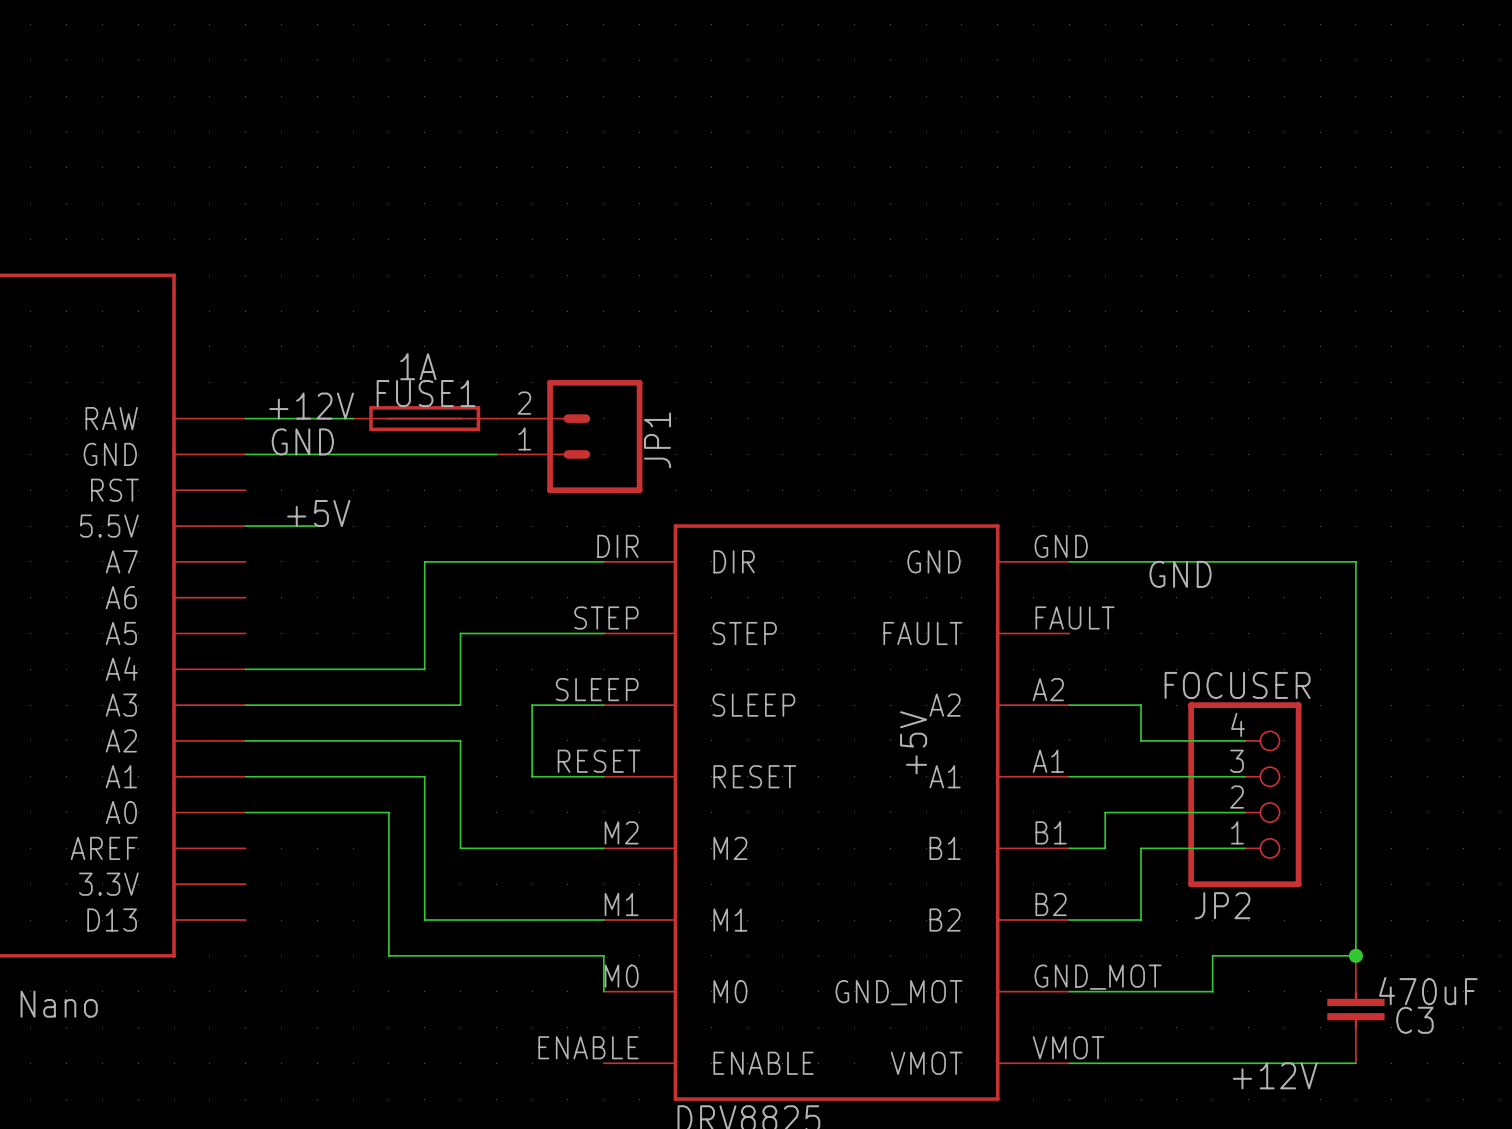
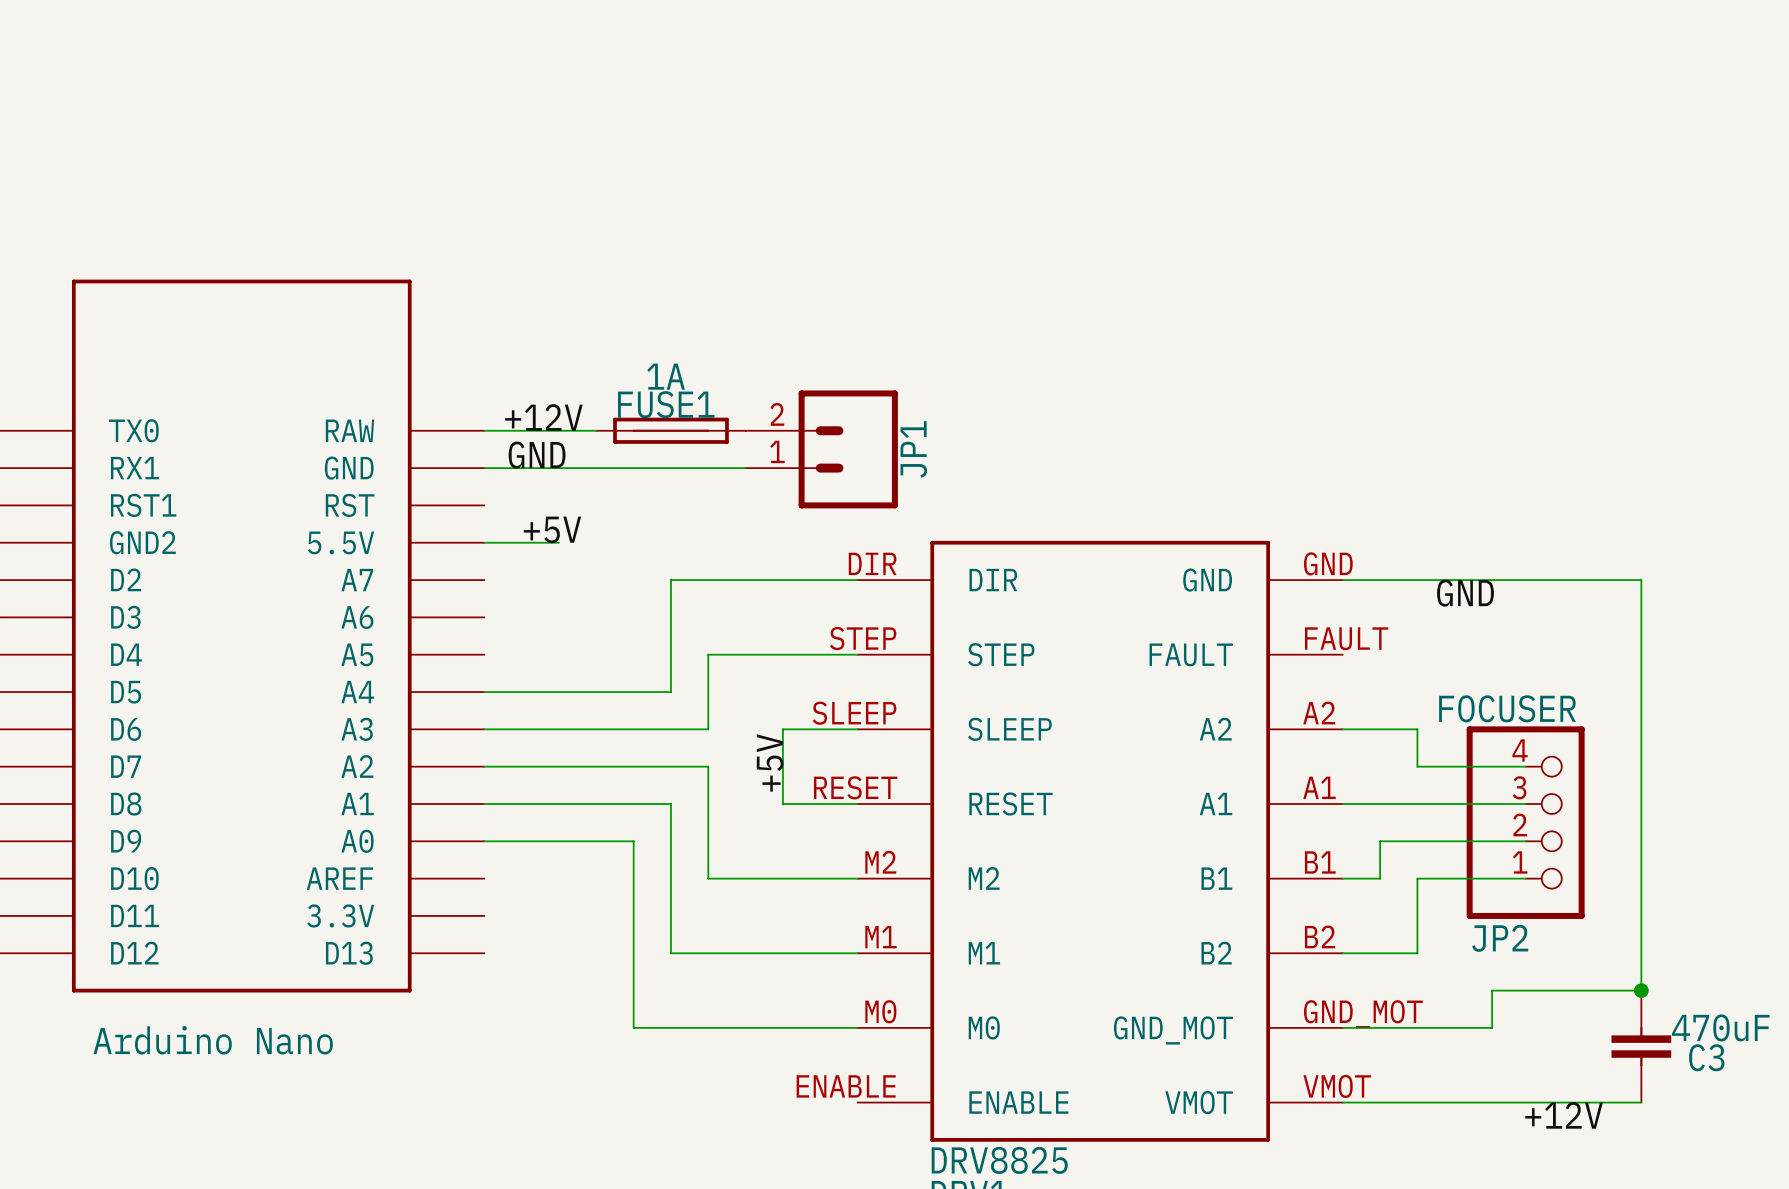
label: none -> +5V (770, 762)
label: +5V (913, 742) -> none
wire: (388, 955) (603, 955) (603, 991) -> (633, 990) (633, 1027) (857, 1027)

